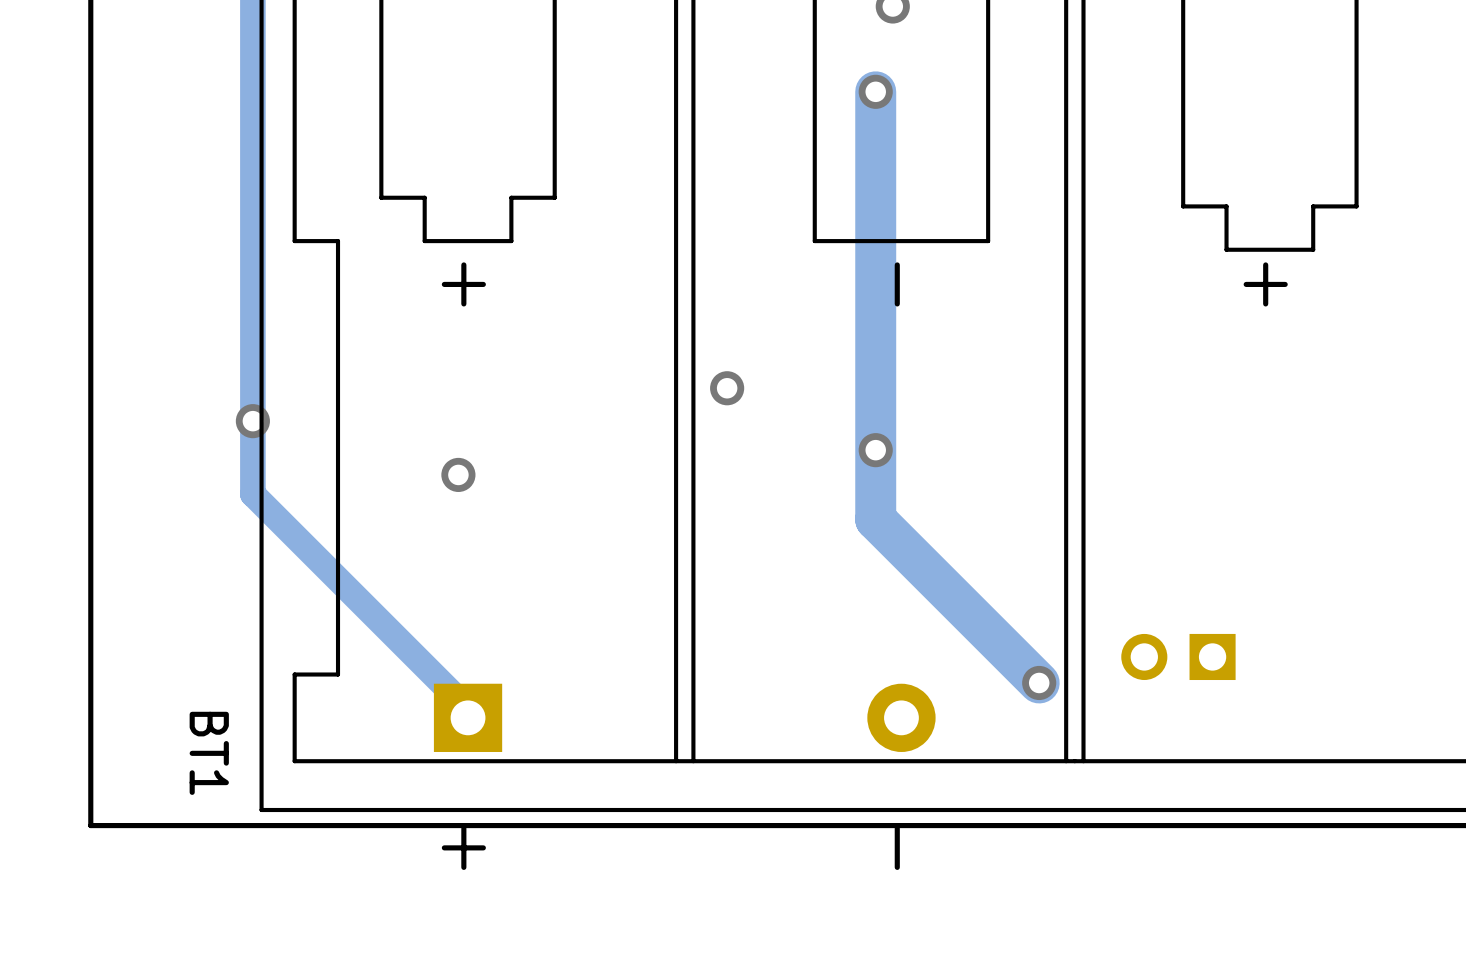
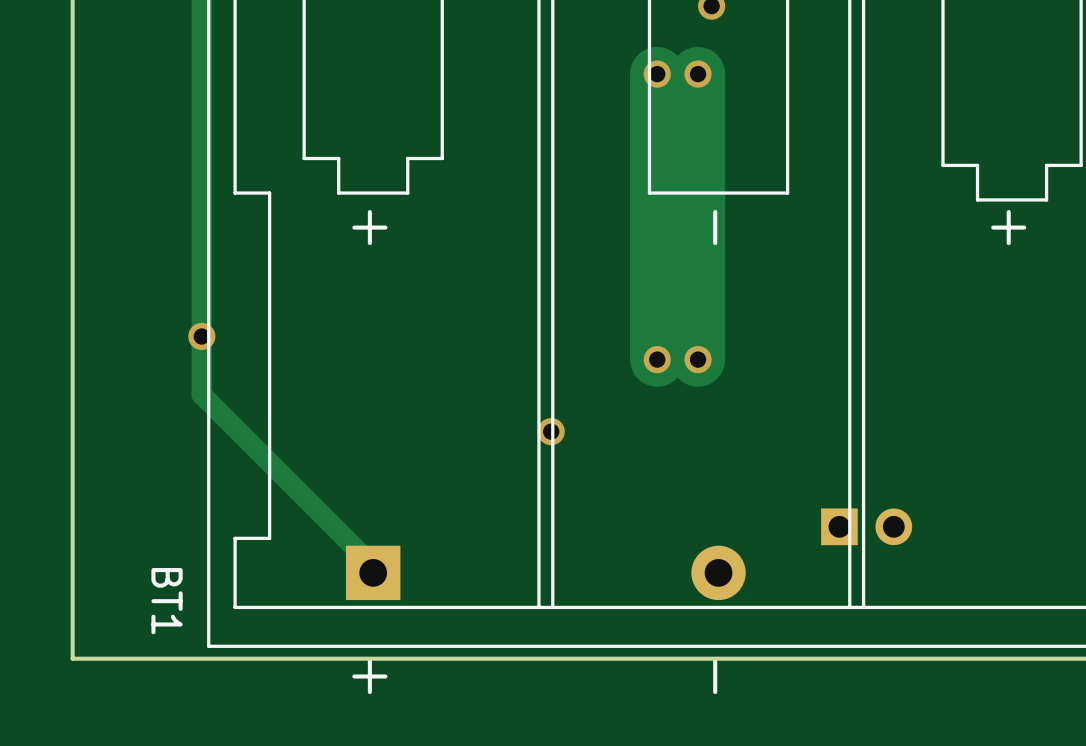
track: none -> (657, 74) (657, 359)
via: none -> (657, 74)
track width: thin (875, 91) (875, 450) -> thick (698, 74) (698, 359)
via: (727, 388) -> none
via: none -> (657, 359)
track: (875, 450) (875, 528) (884, 528) (1039, 682) (875, 519) (875, 450) -> none
via: (458, 474) -> none
via: none -> (551, 431)
part rotation: 0° (1178, 656) -> 180° (866, 526)
part position: (1178, 656) -> (866, 526)
via: (1039, 682) -> none

